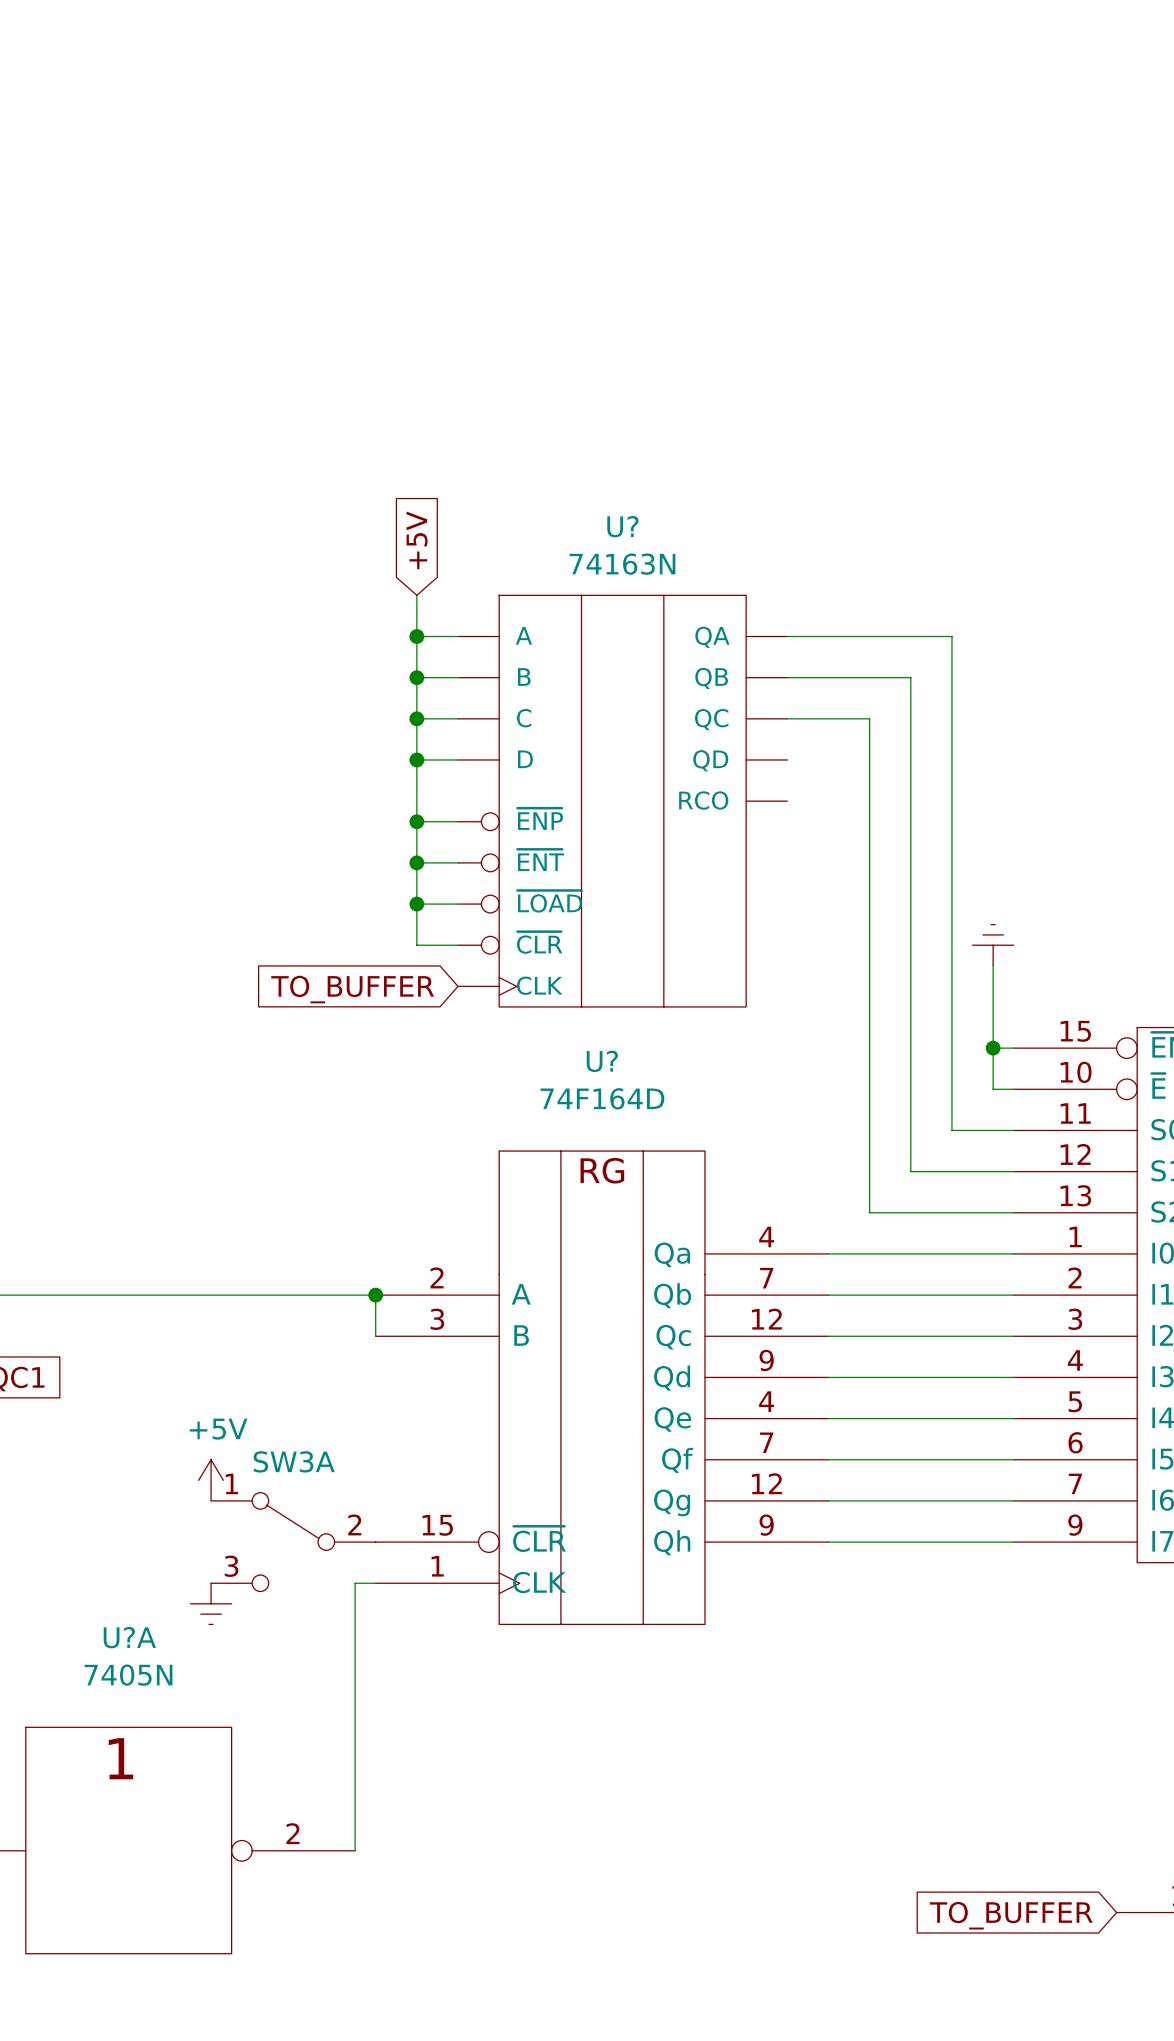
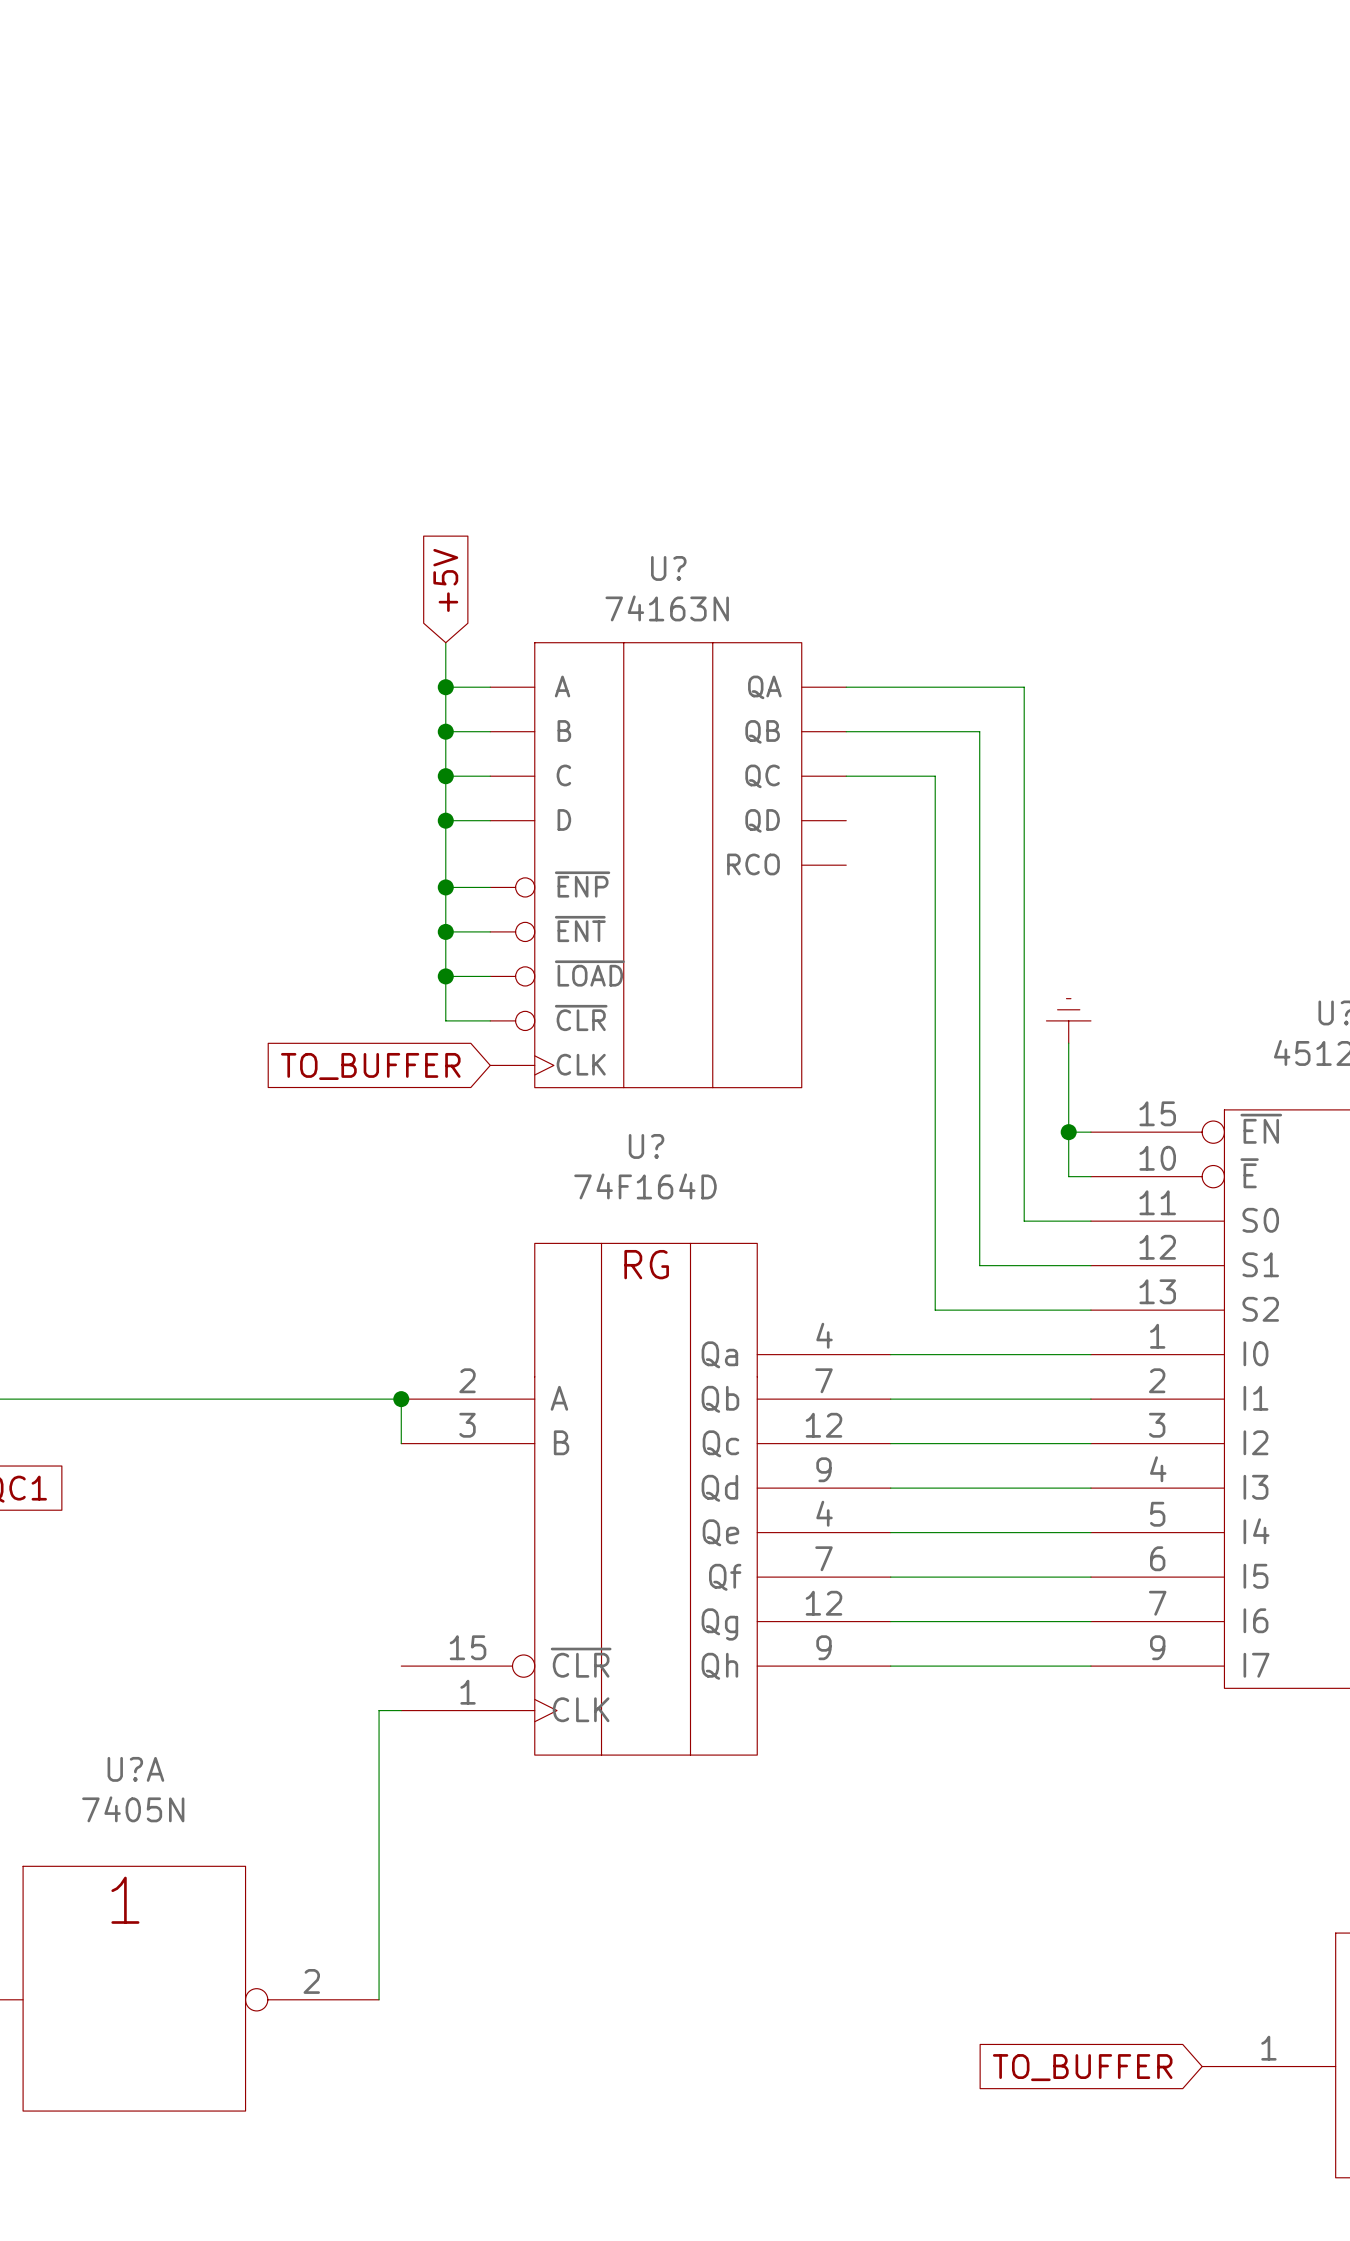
power symbol: +5V (211, 1480) -> none
SW3A: (293, 1542) -> none
power symbol: (211, 1603) -> none

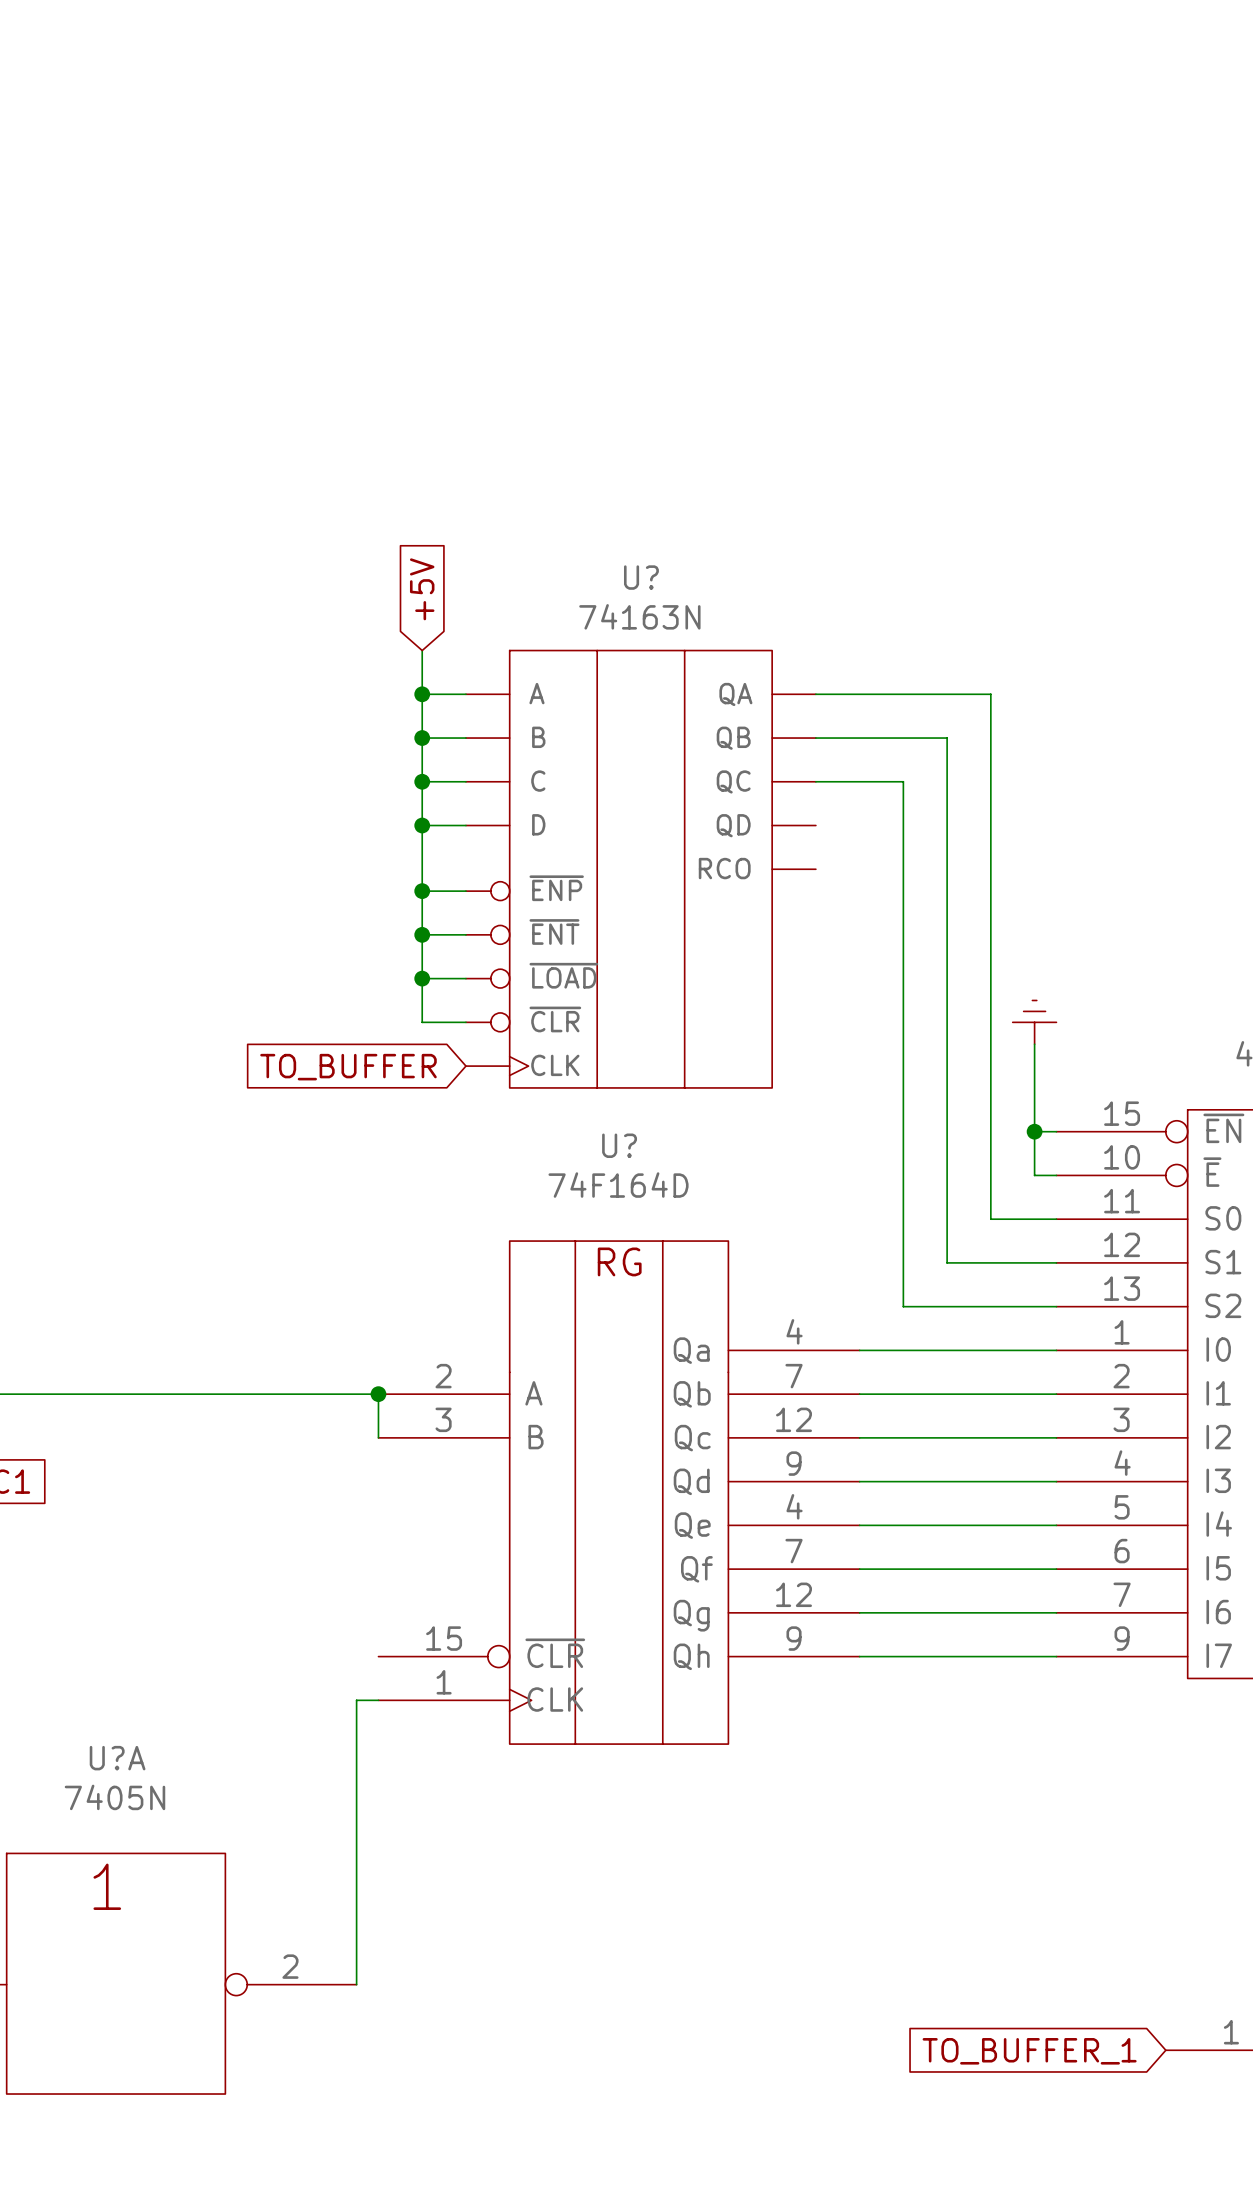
global label: TO_BUFFER (1082, 2067) -> TO_BUFFER_1 (1029, 2051)

